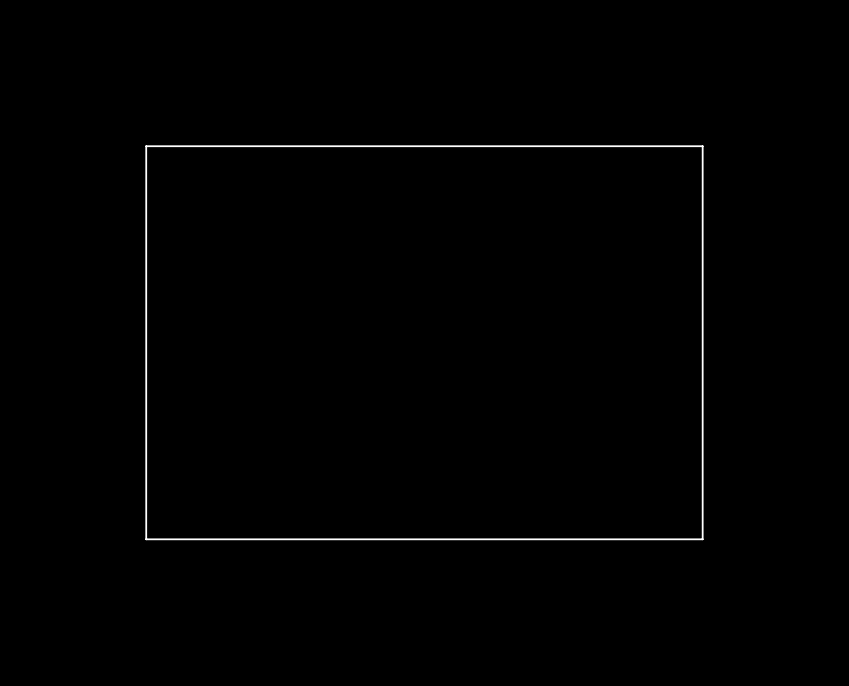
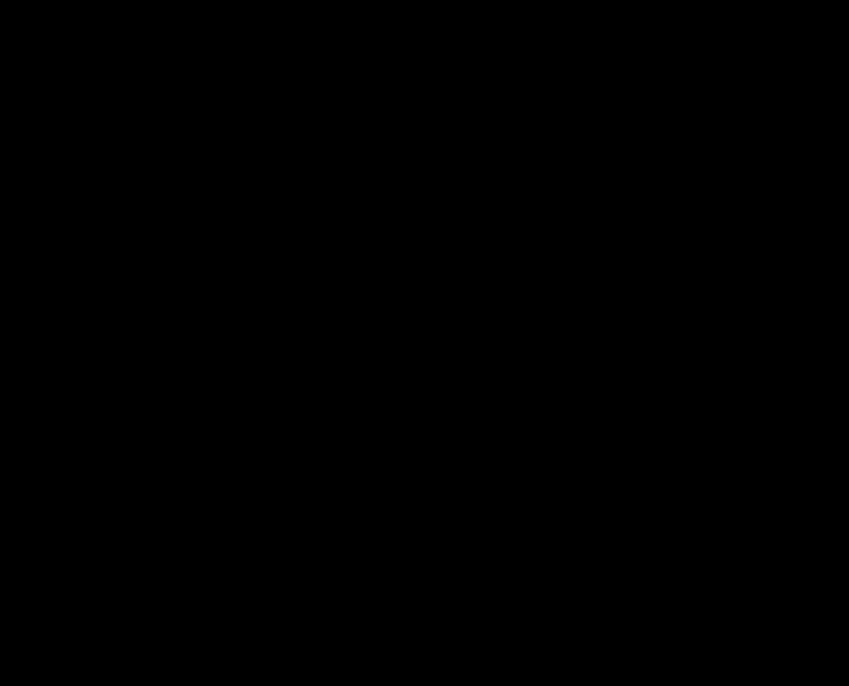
board edge: (702, 146) (146, 146) (146, 539) (702, 539) (702, 146) -> none

